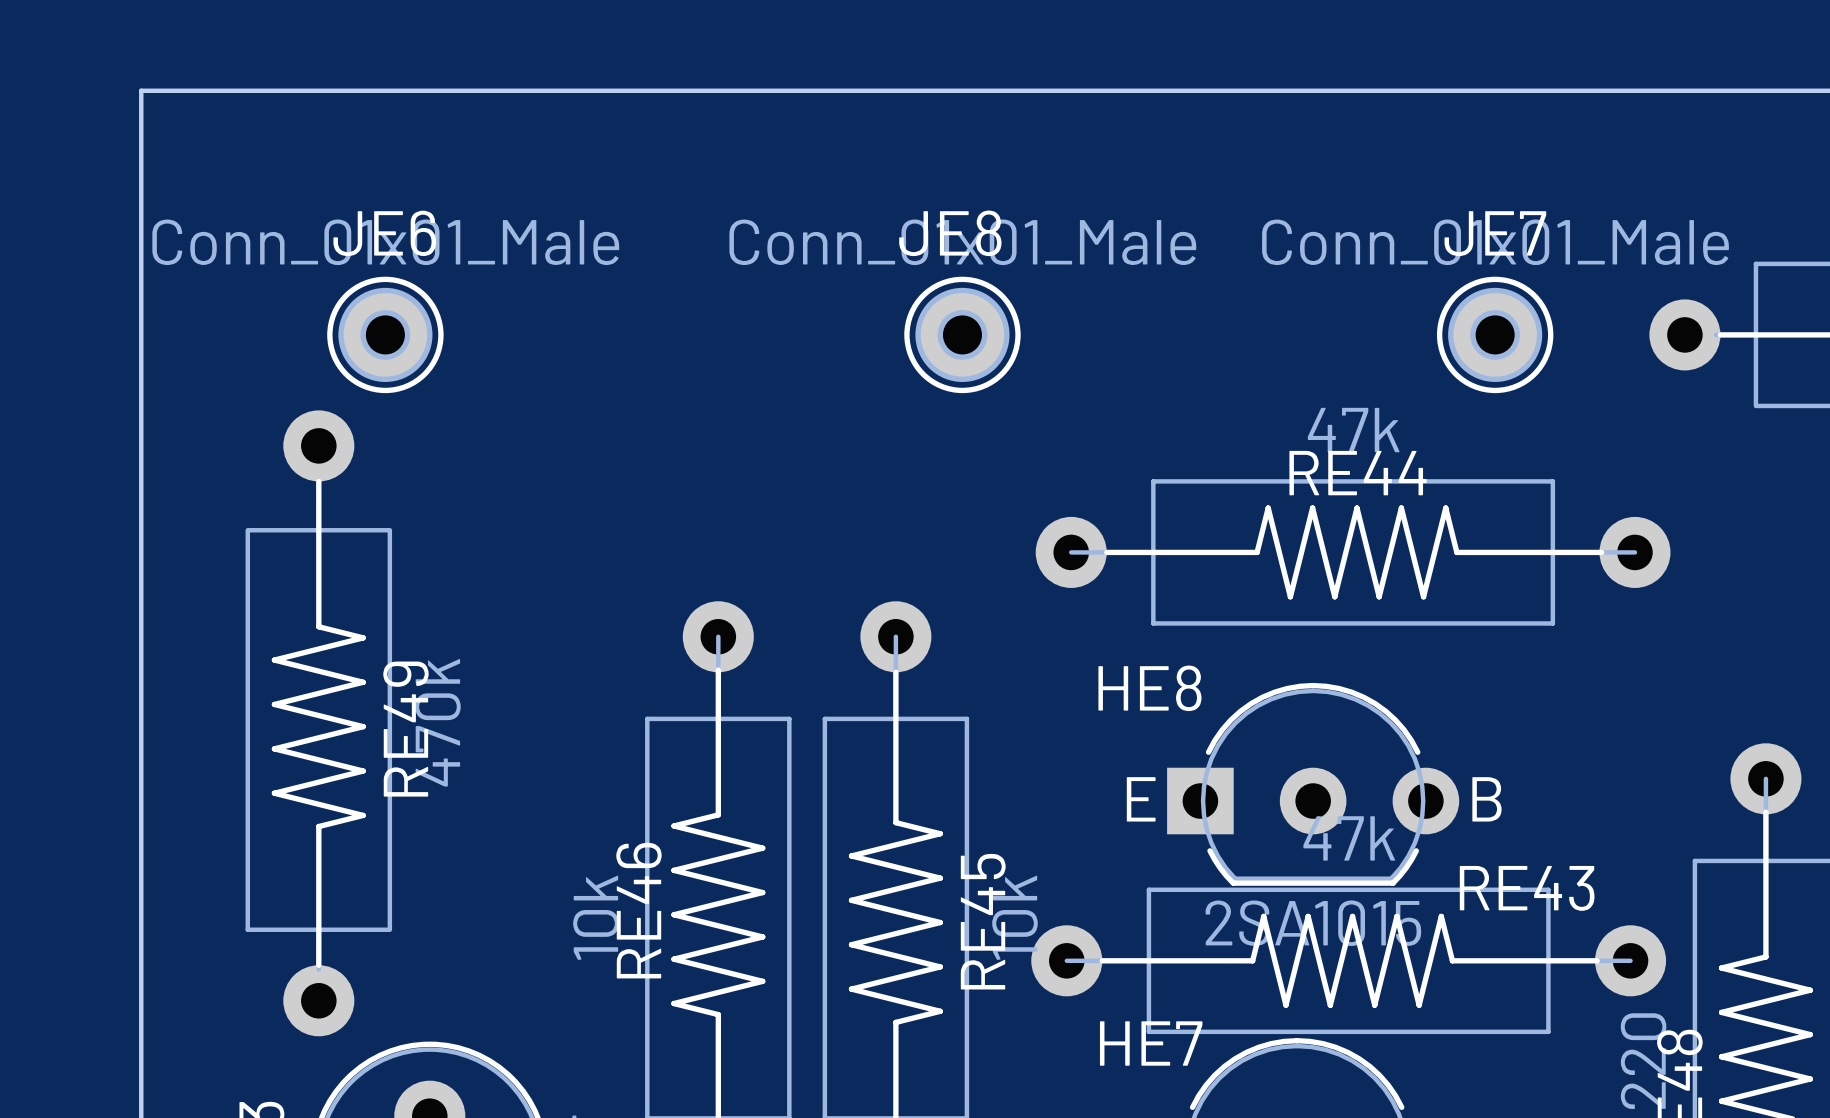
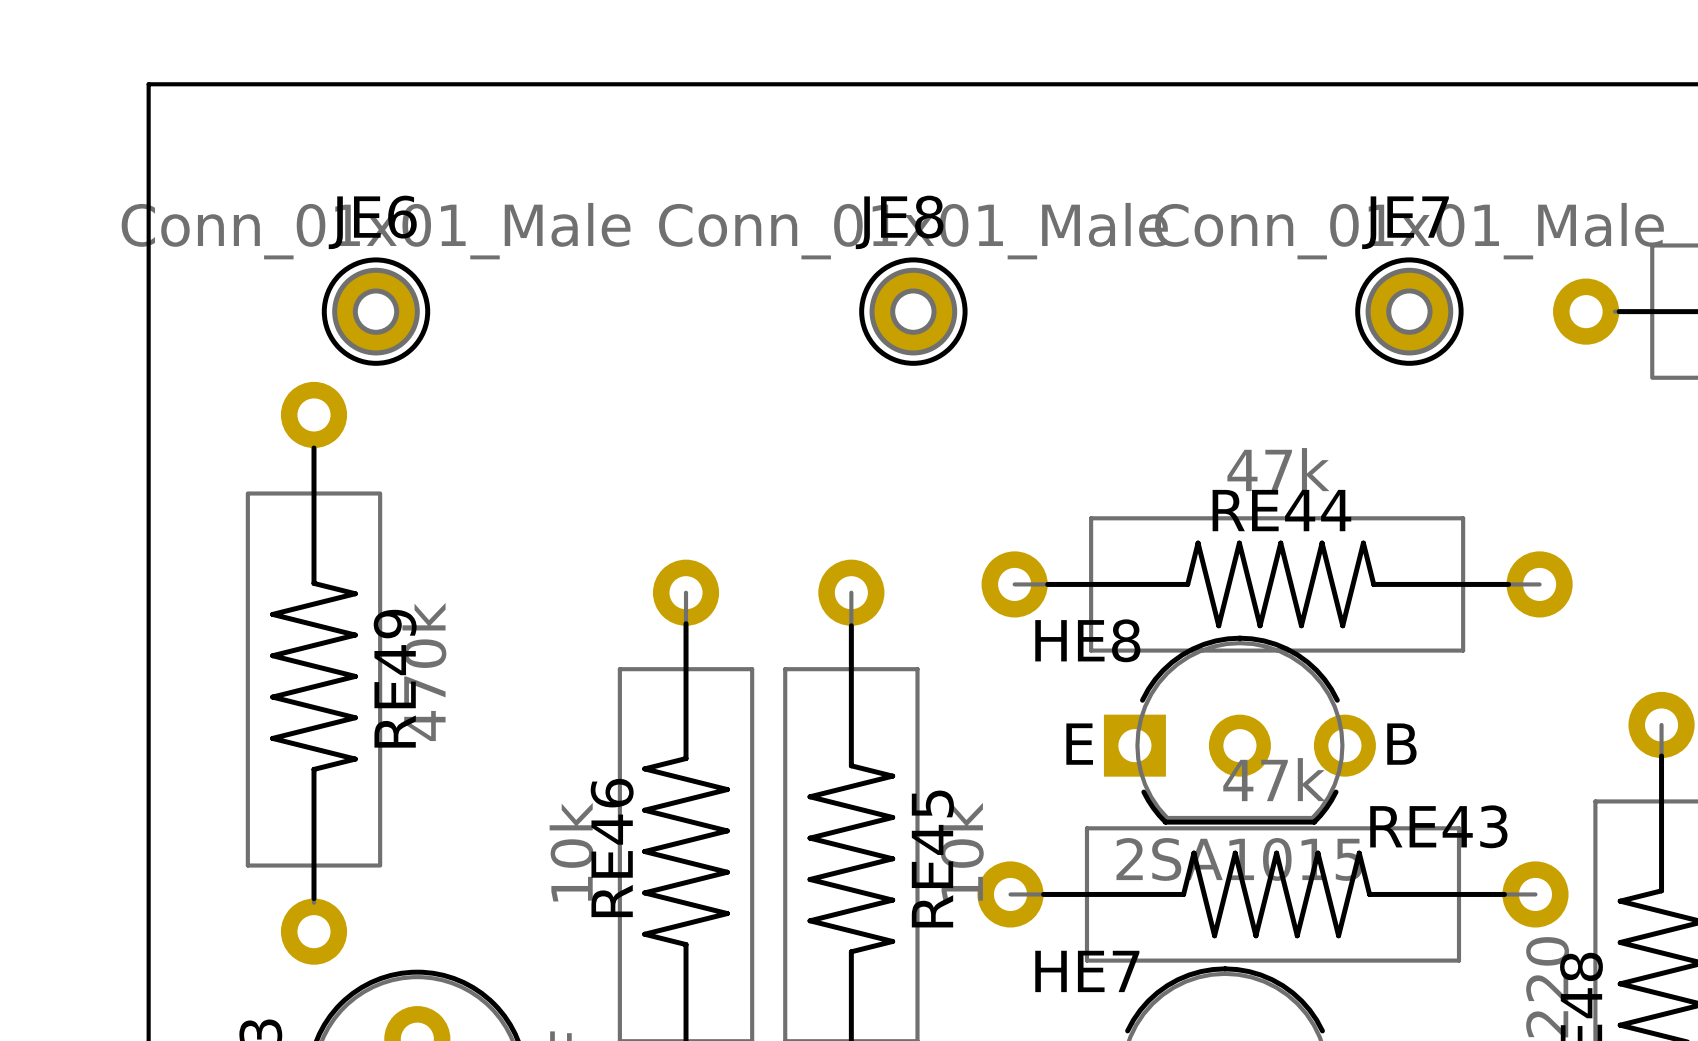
RE44 position: (1353, 552) -> (1277, 584)

